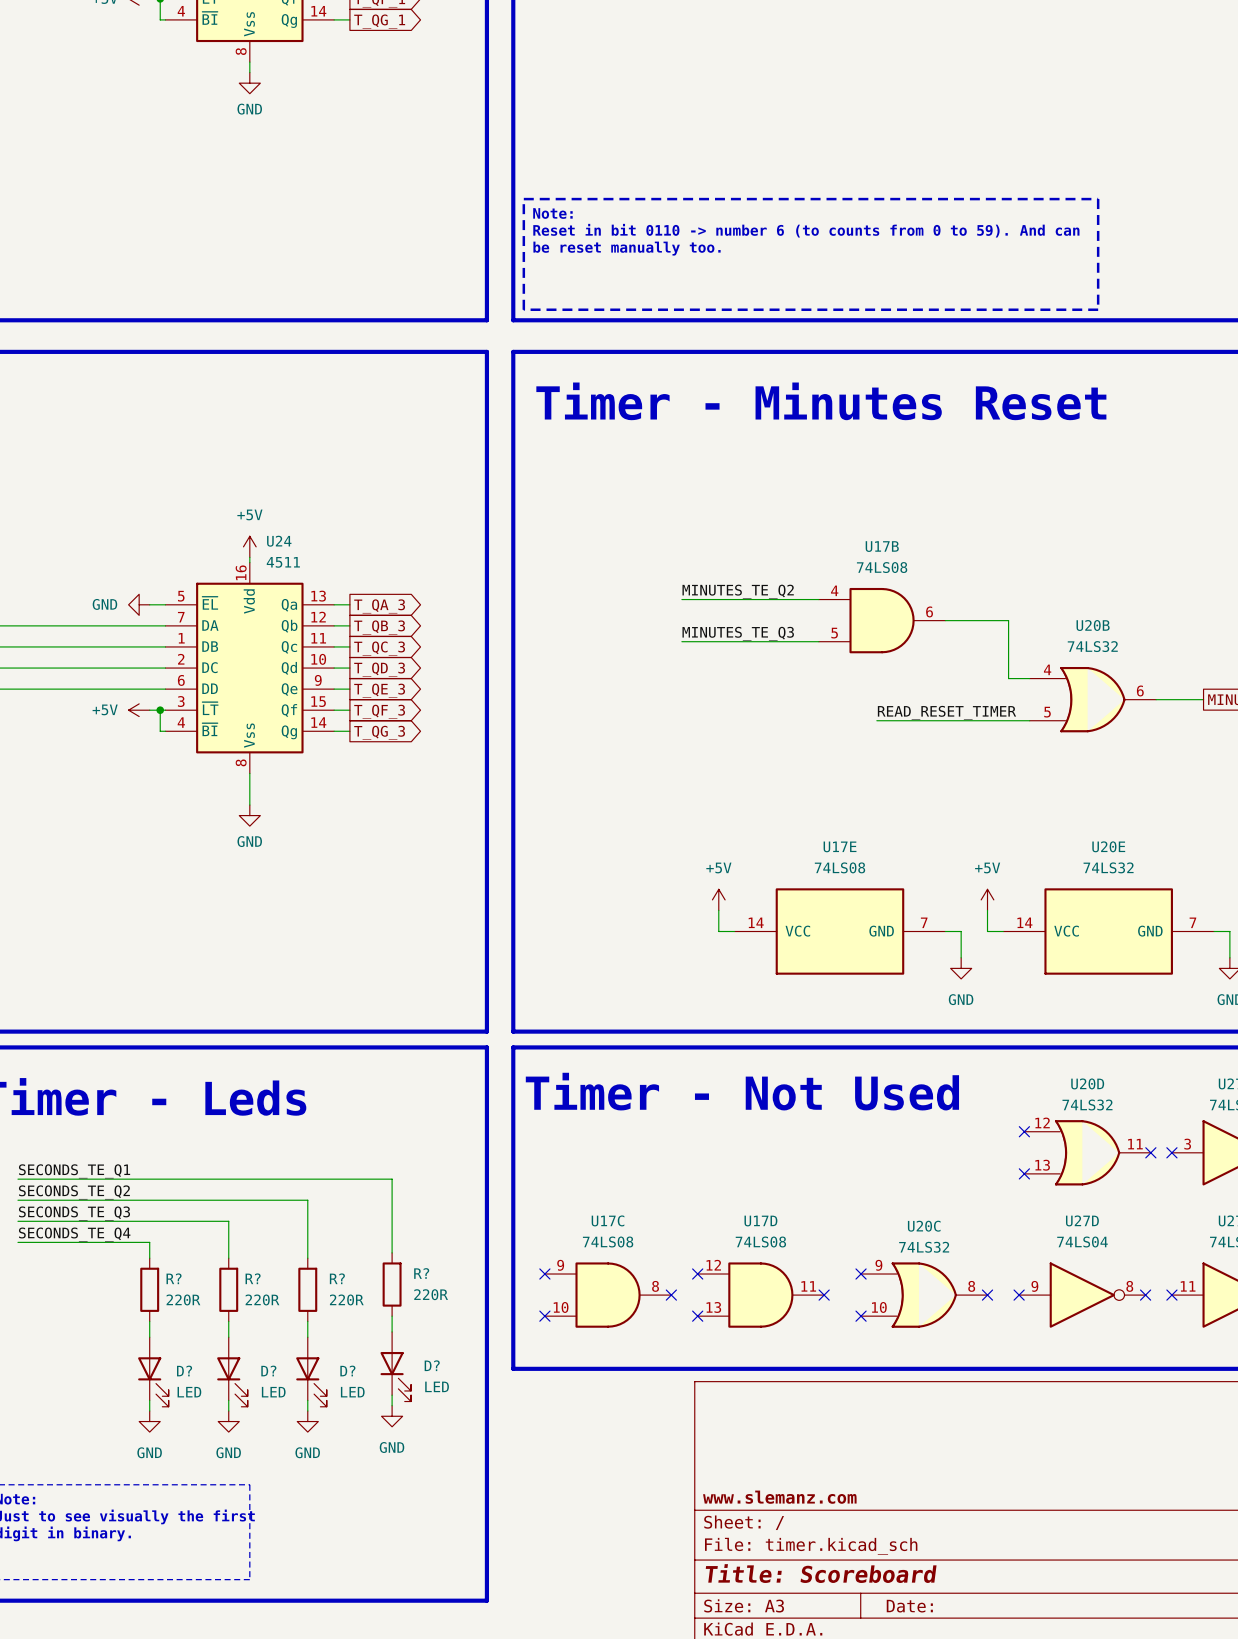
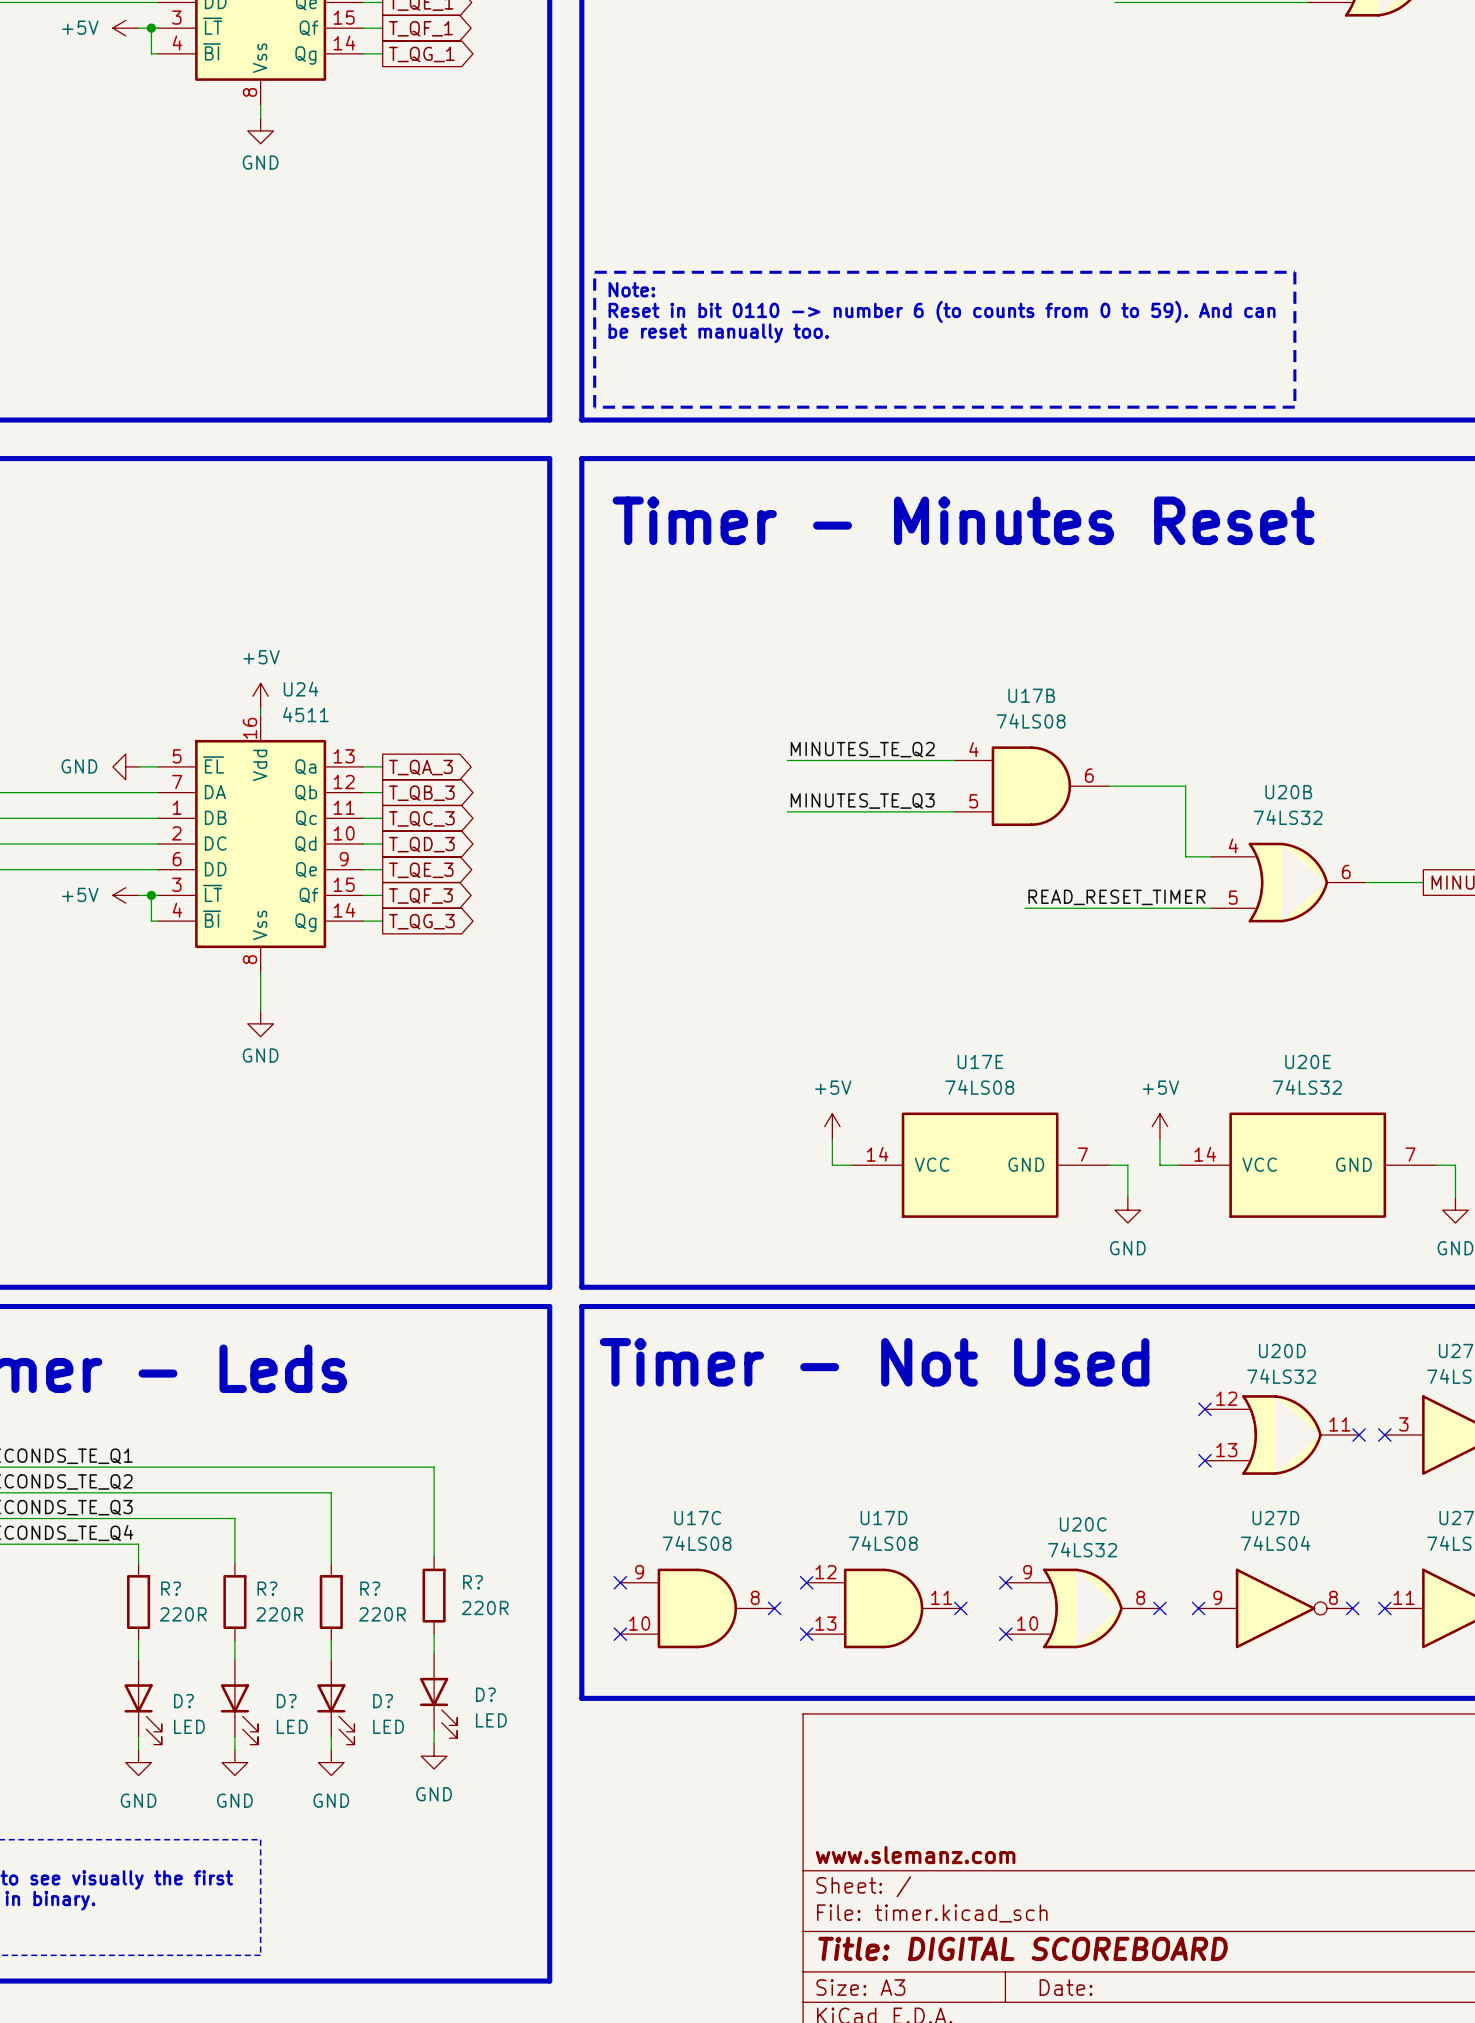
title block: Title: Scoreboard (821, 1573) -> Title: DIGITAL SCOREBOARD (1023, 1948)

